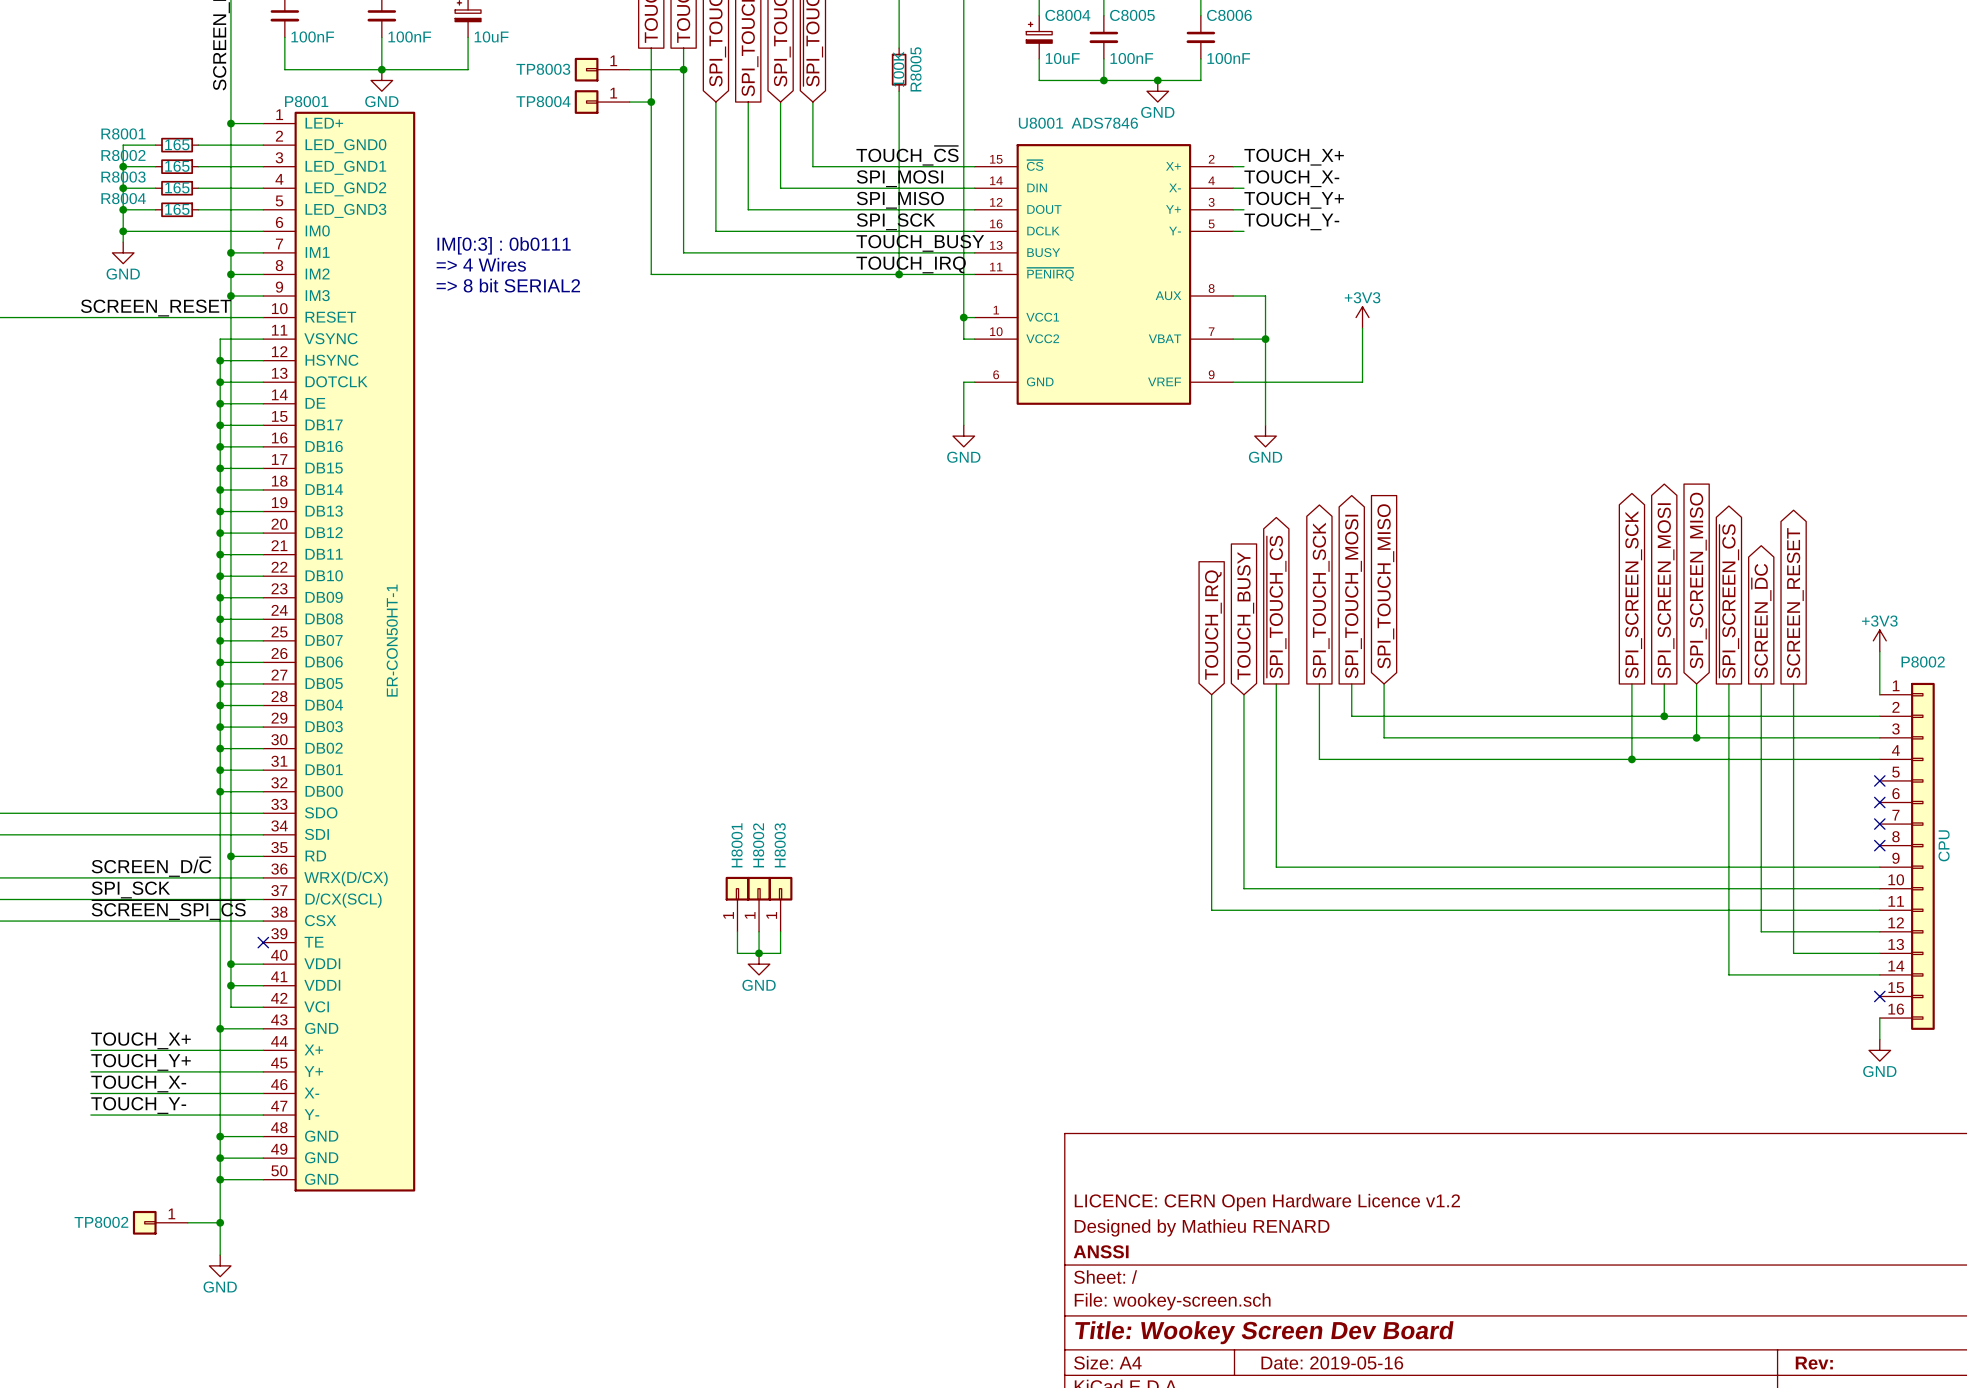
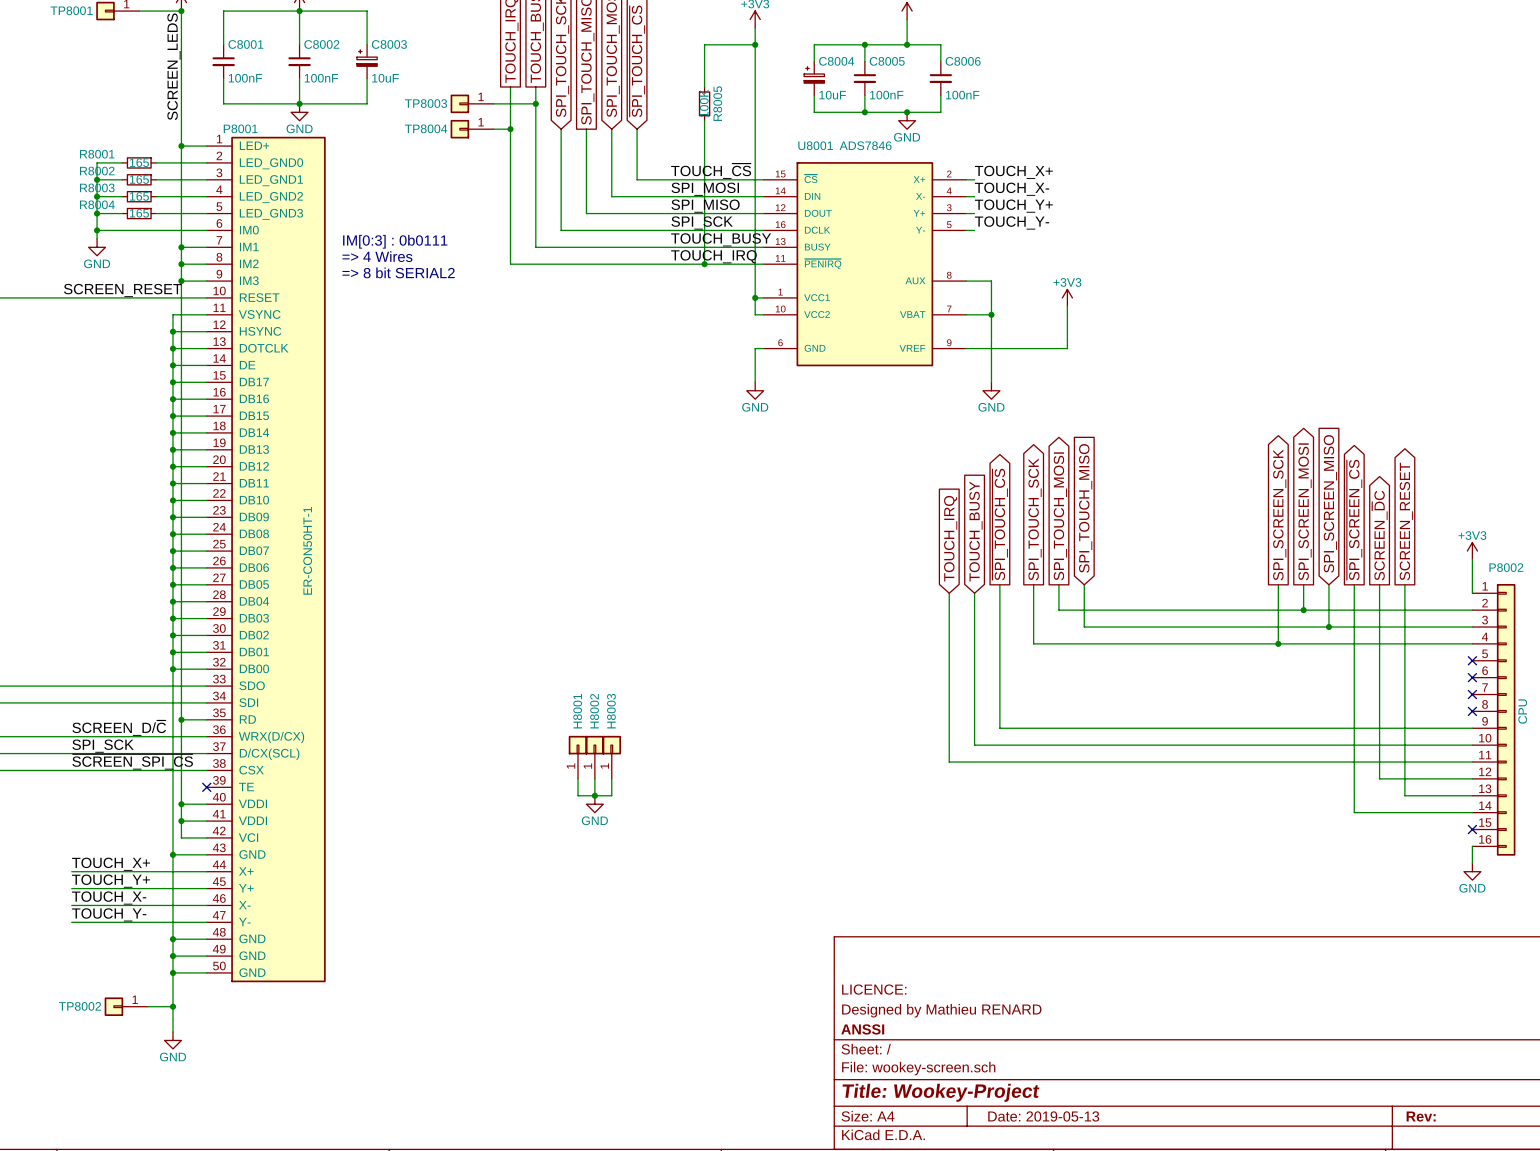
title block: LICENCE: CERN Open Hardware Licence v1.2 (1267, 1202) -> LICENCE: (874, 989)
title block: Title: Wookey Screen Dev Board (1264, 1332) -> Title: Wookey-Project (940, 1092)
title block: Date: 2019-05-16 (1332, 1362) -> Date: 2019-05-13 (1043, 1116)

